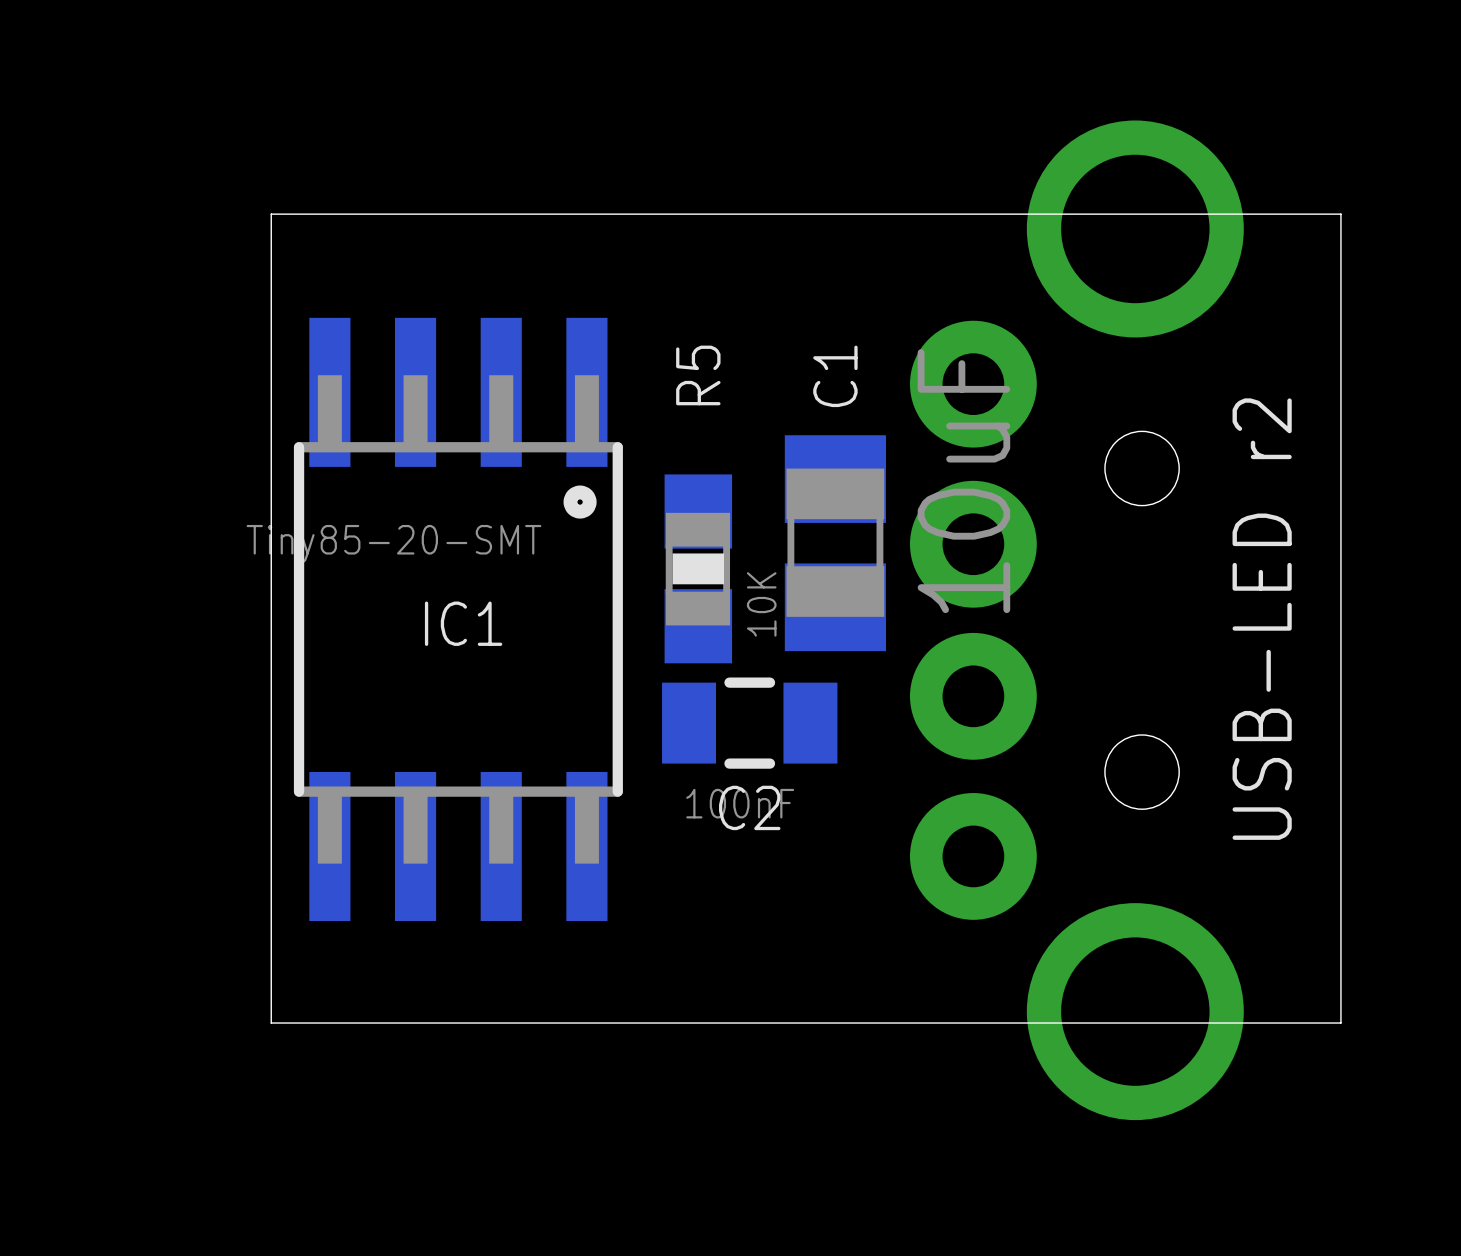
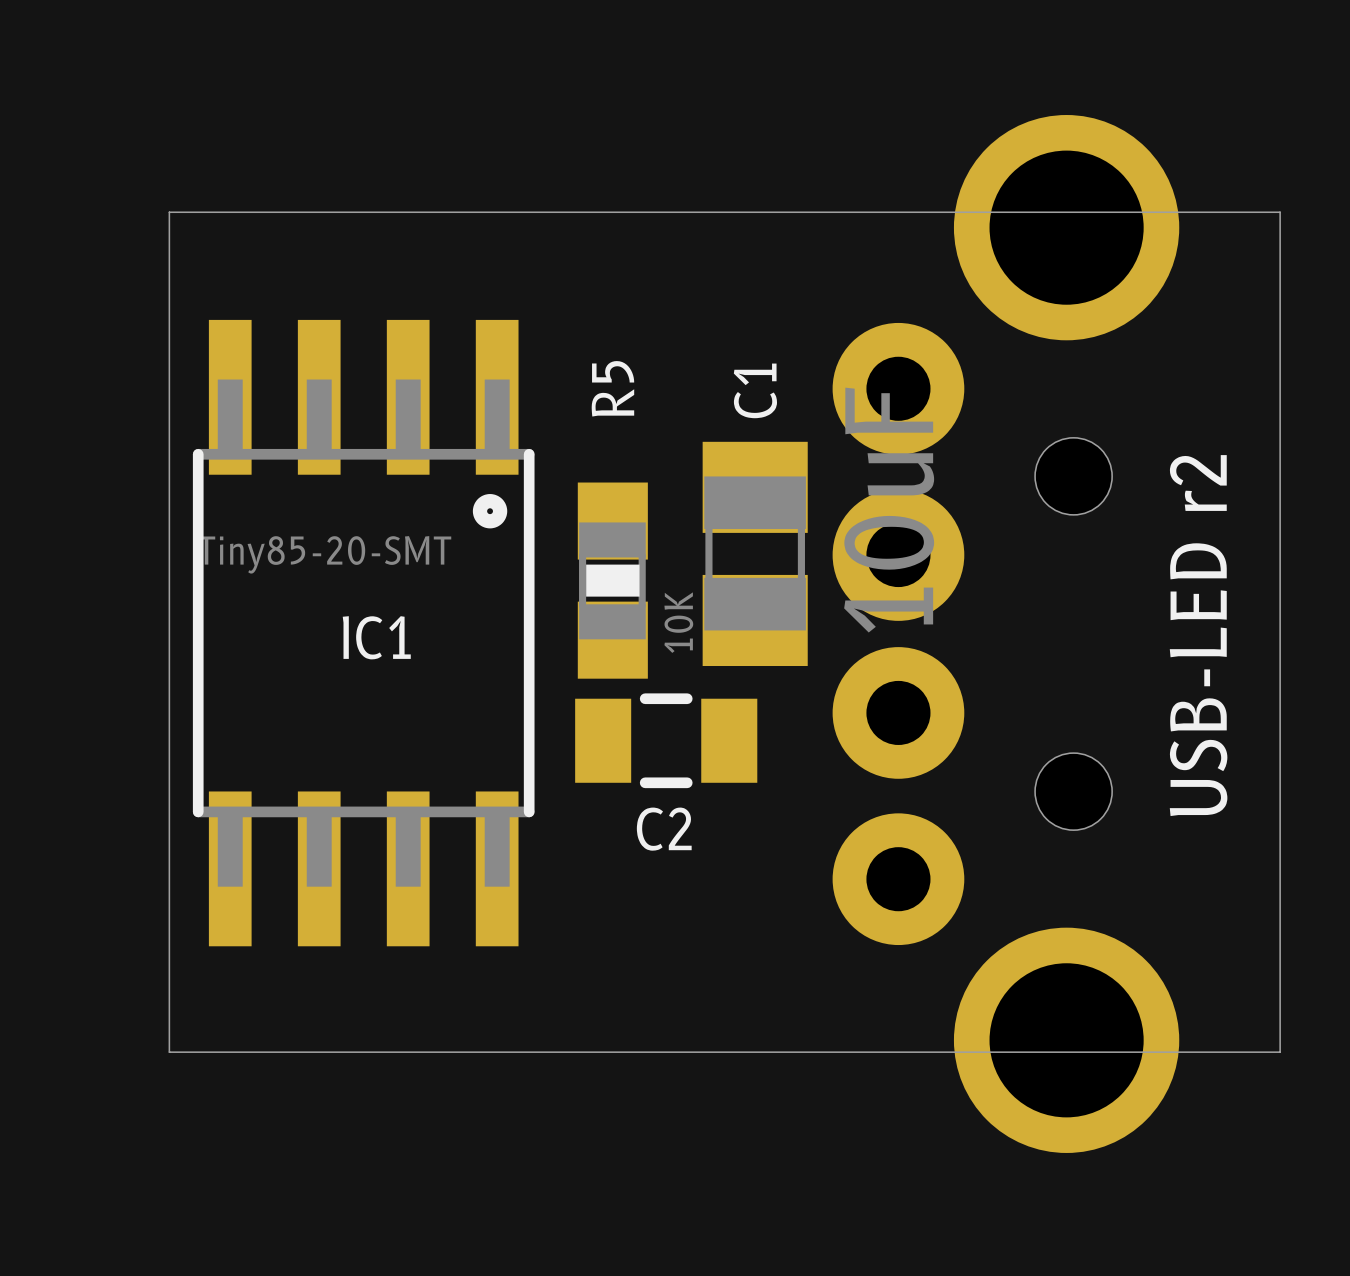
C2 value: 100nF (740, 803) -> none

